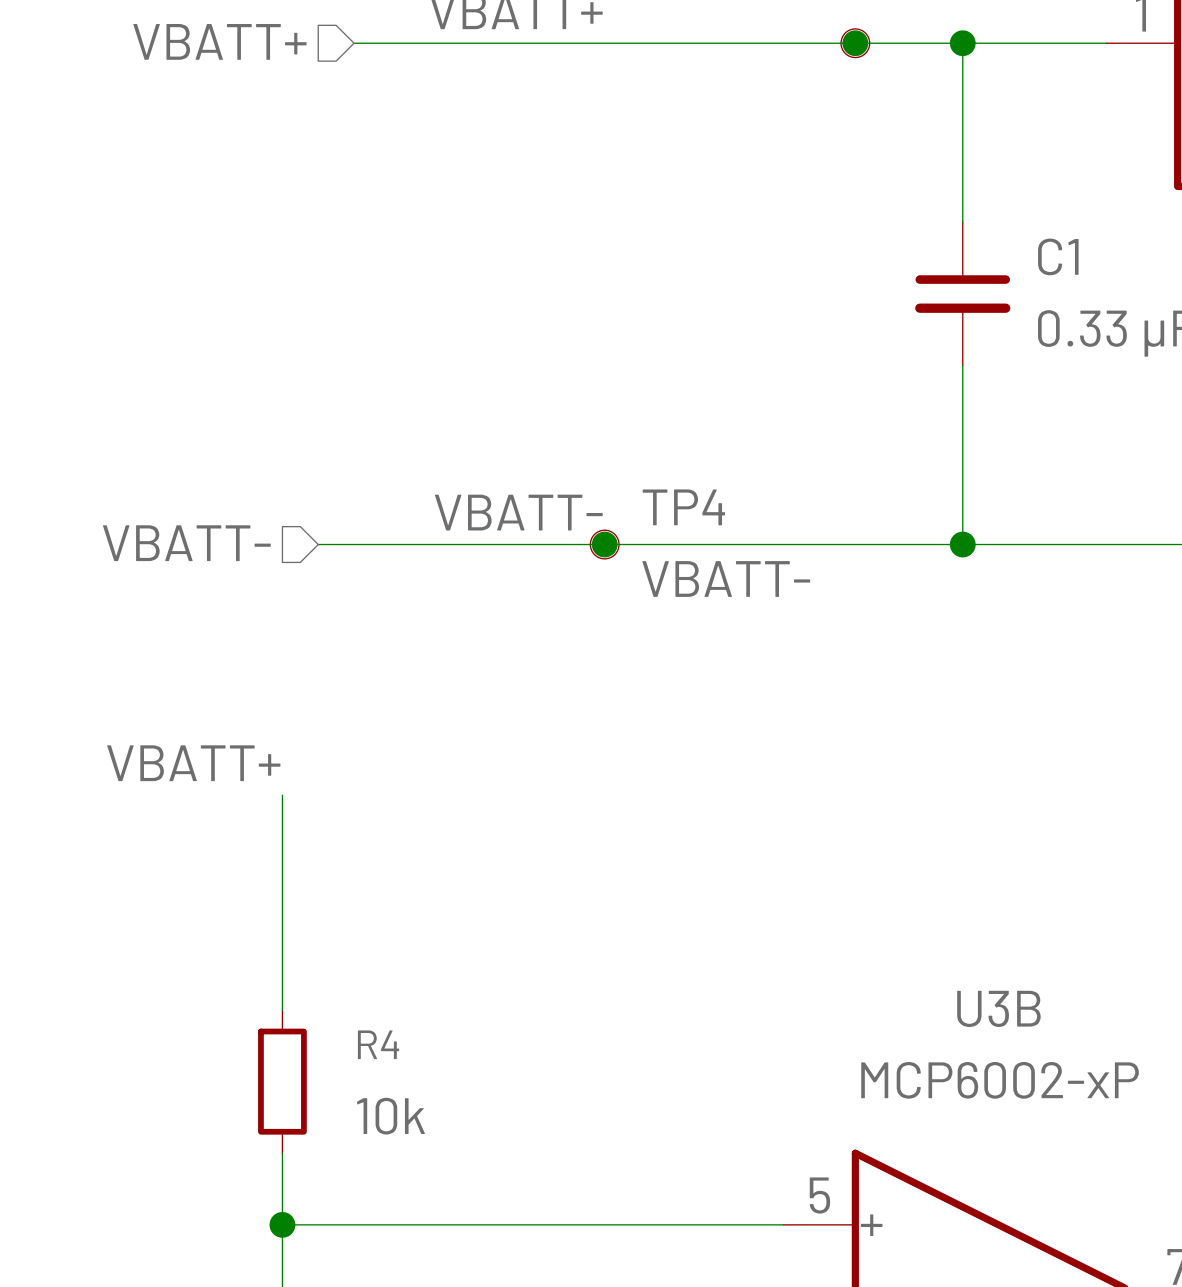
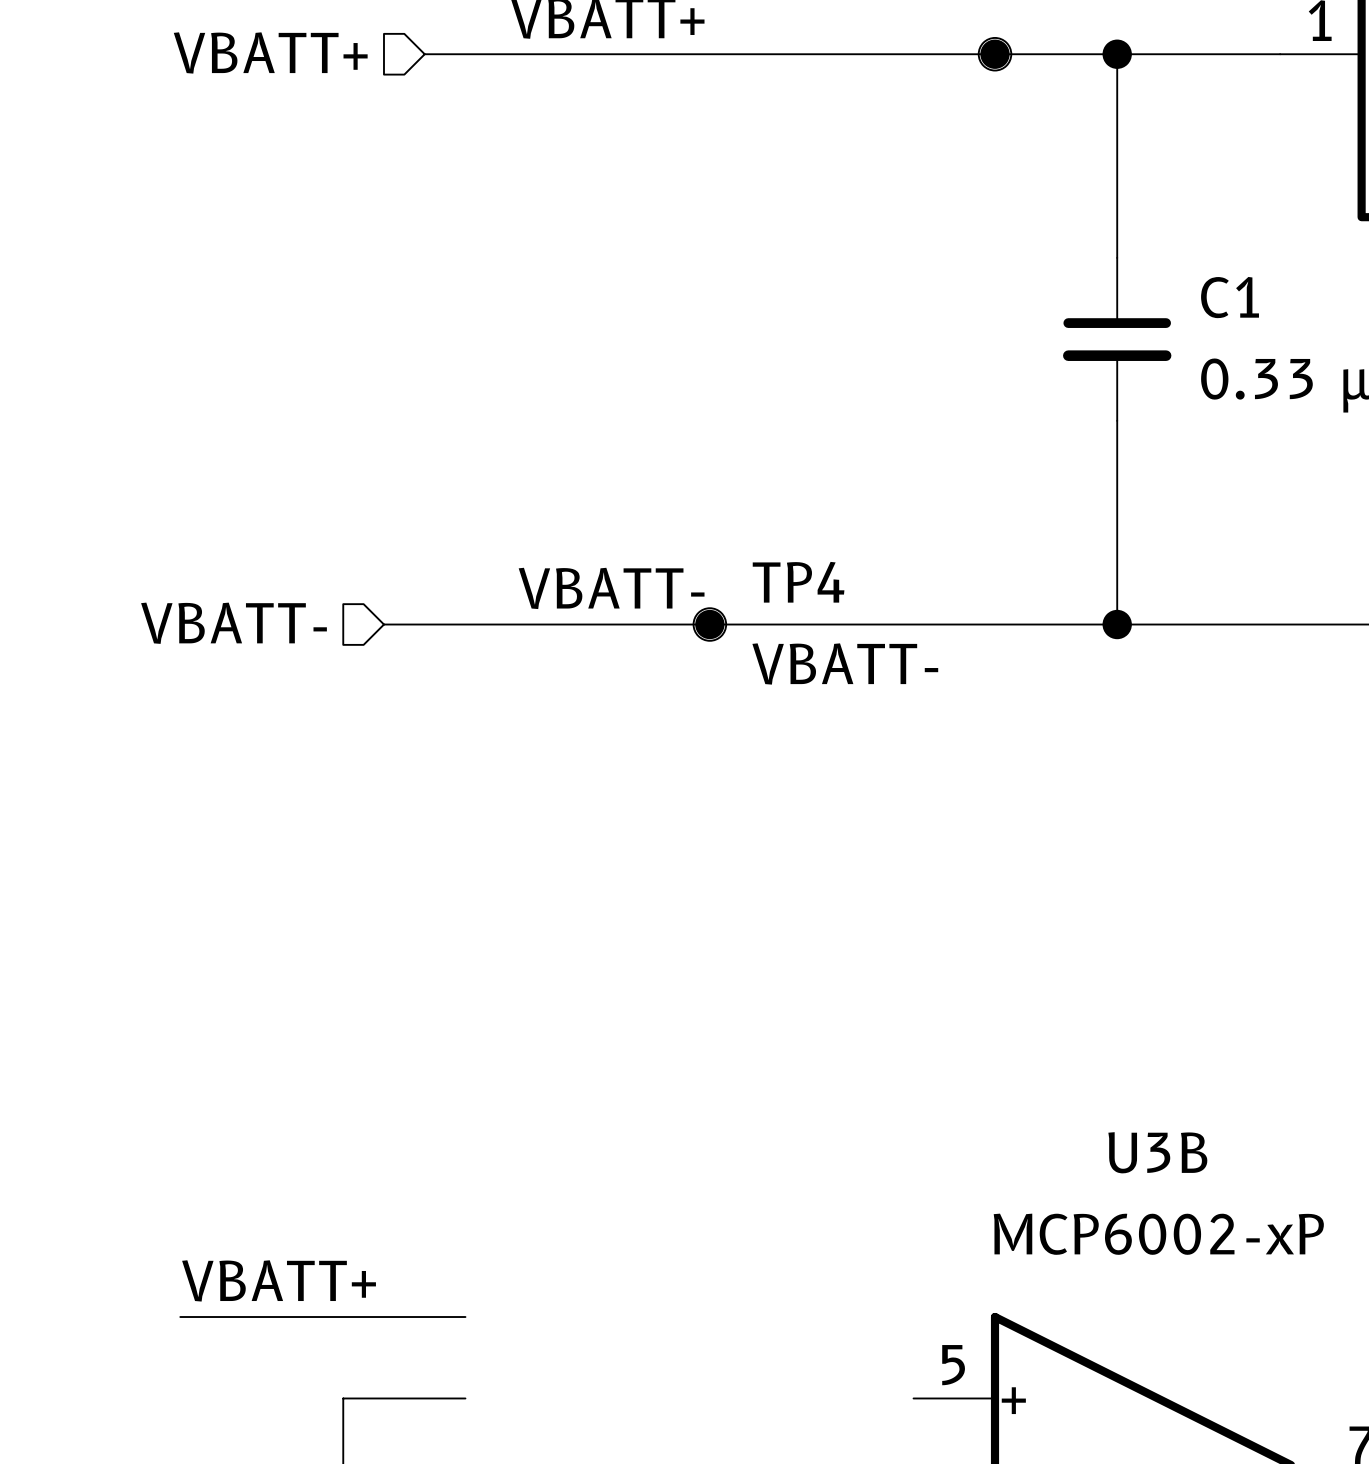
label position: VBATT+ (193, 763) -> VBATT+ (279, 1280)
wire: (282, 795) (282, 1010) -> none
R4: 10k (282, 1081) -> none
wire: none -> (180, 1317) (465, 1317)
wire: (282, 1153) (282, 1224) -> none
junction: (282, 1224) -> none
wire: (389, 1224) (783, 1224) -> none

